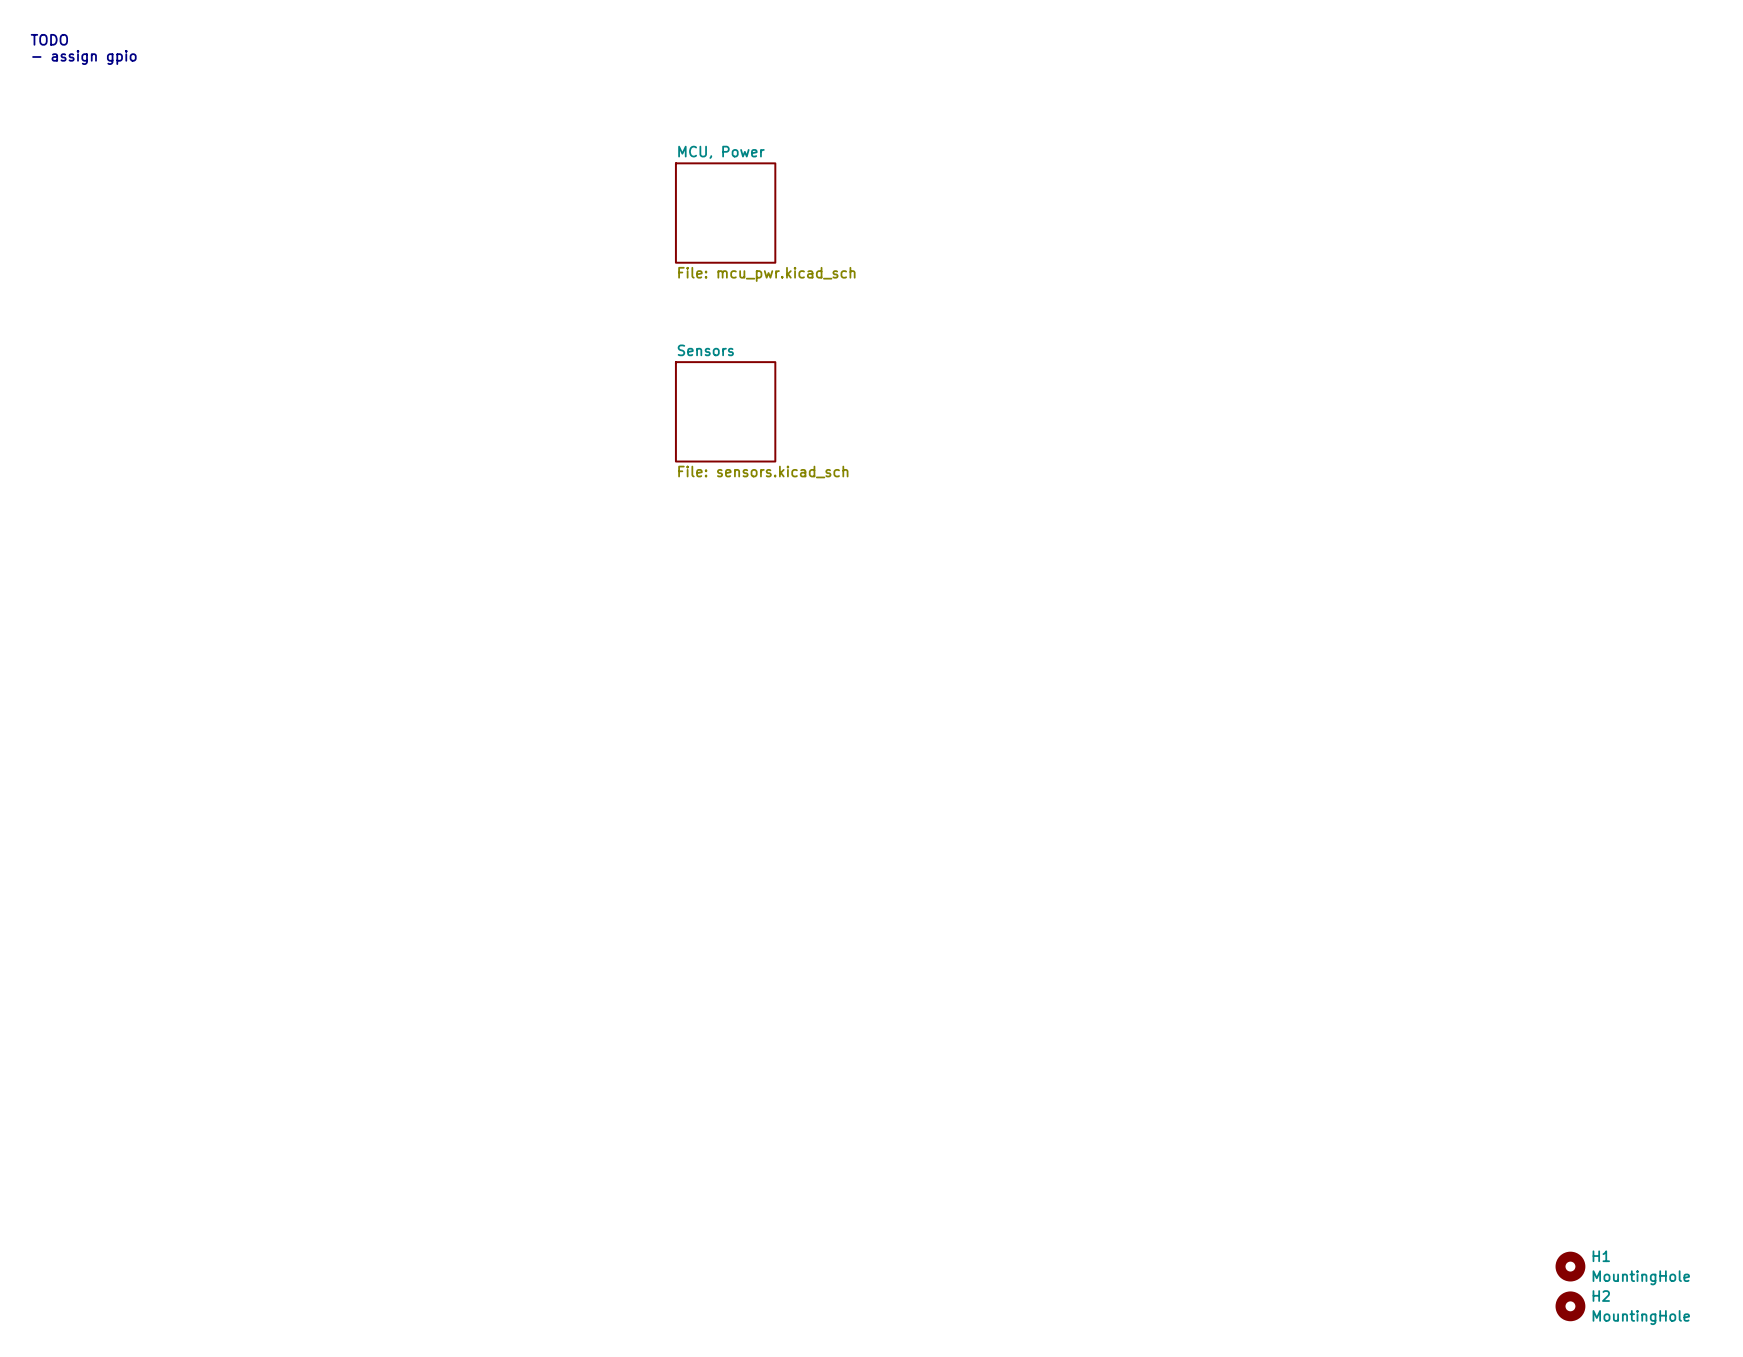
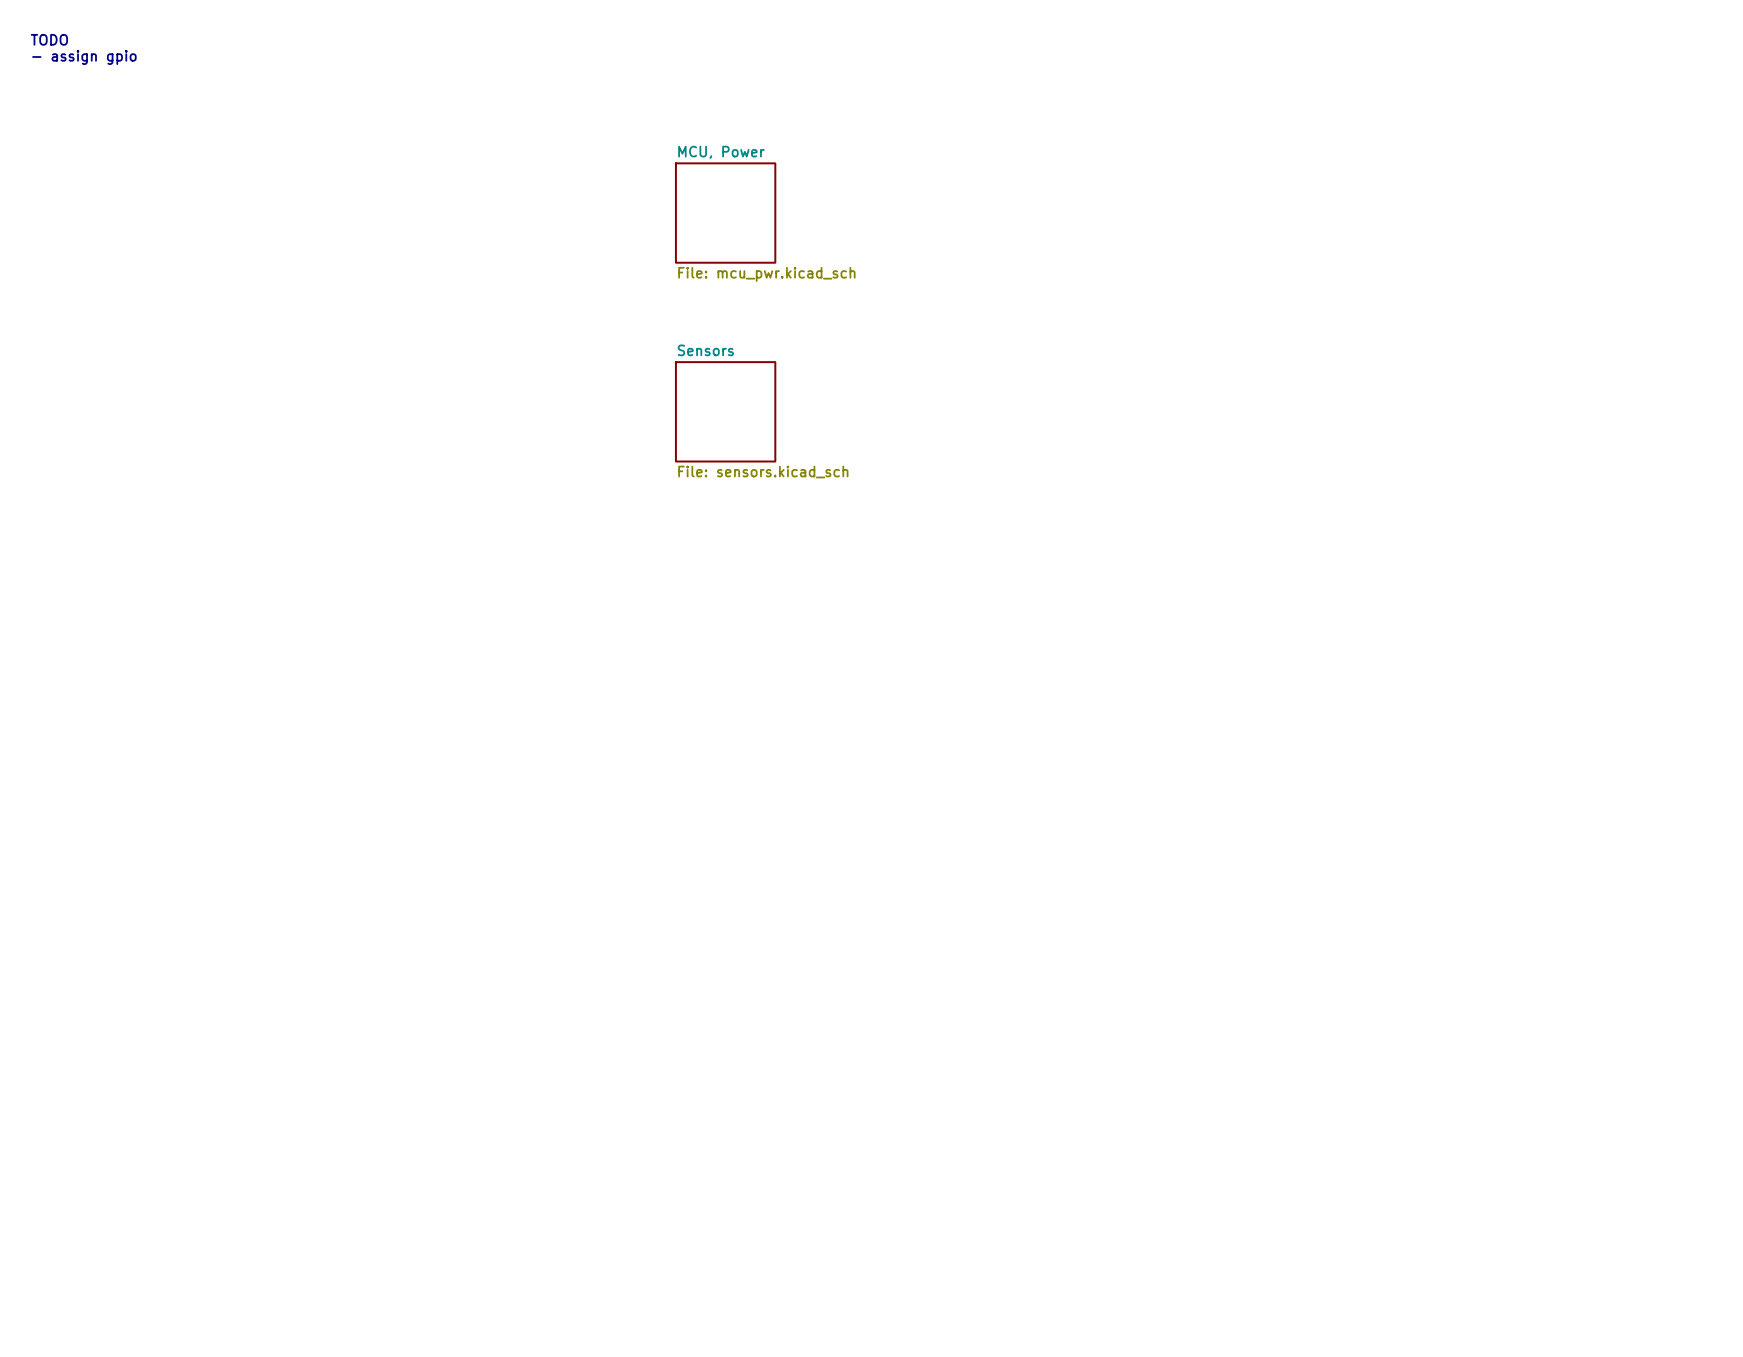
H1: MountingHole (1570, 1266) -> none
H2: MountingHole (1570, 1306) -> none

